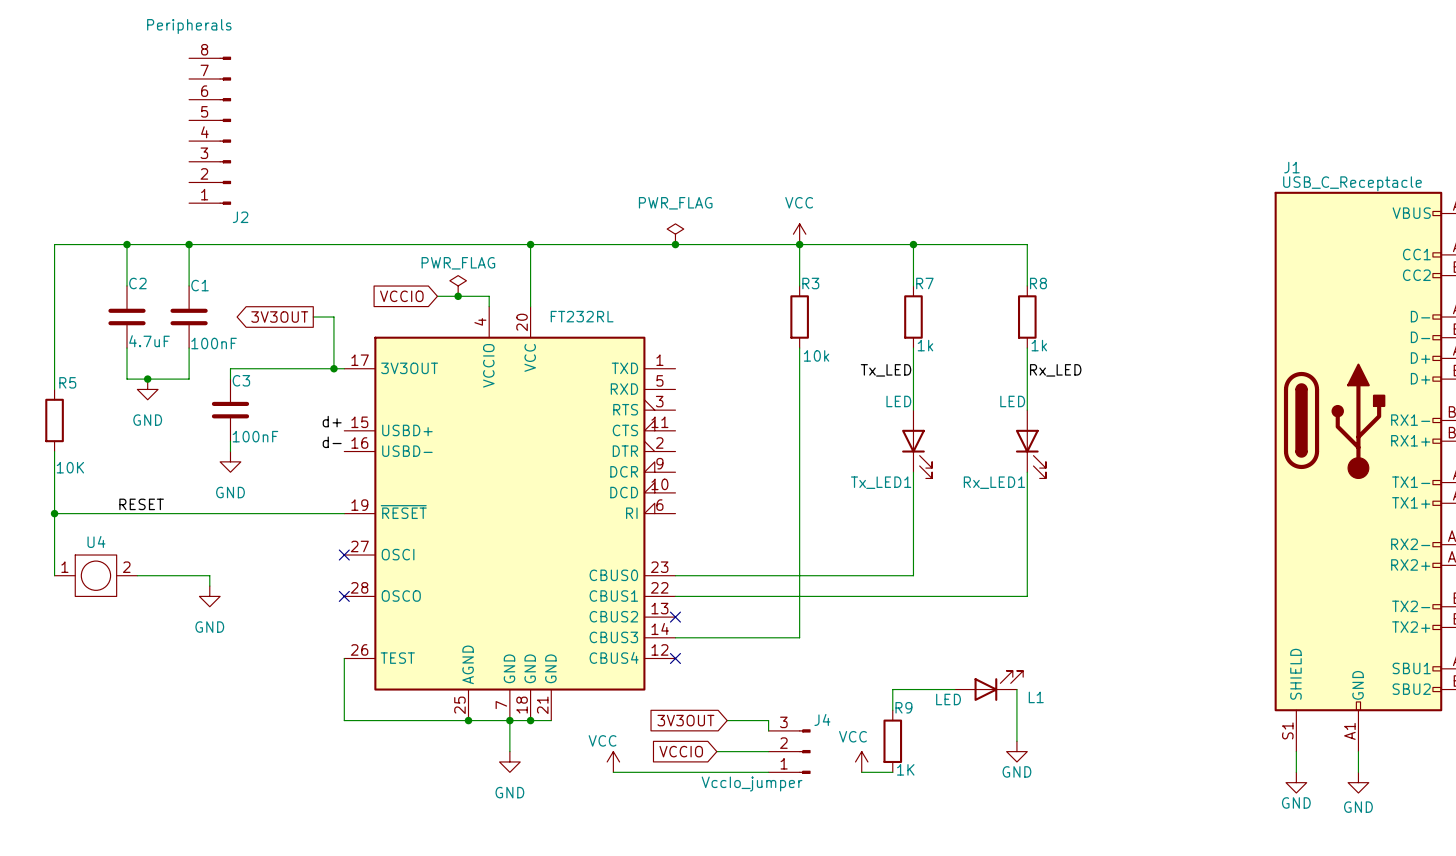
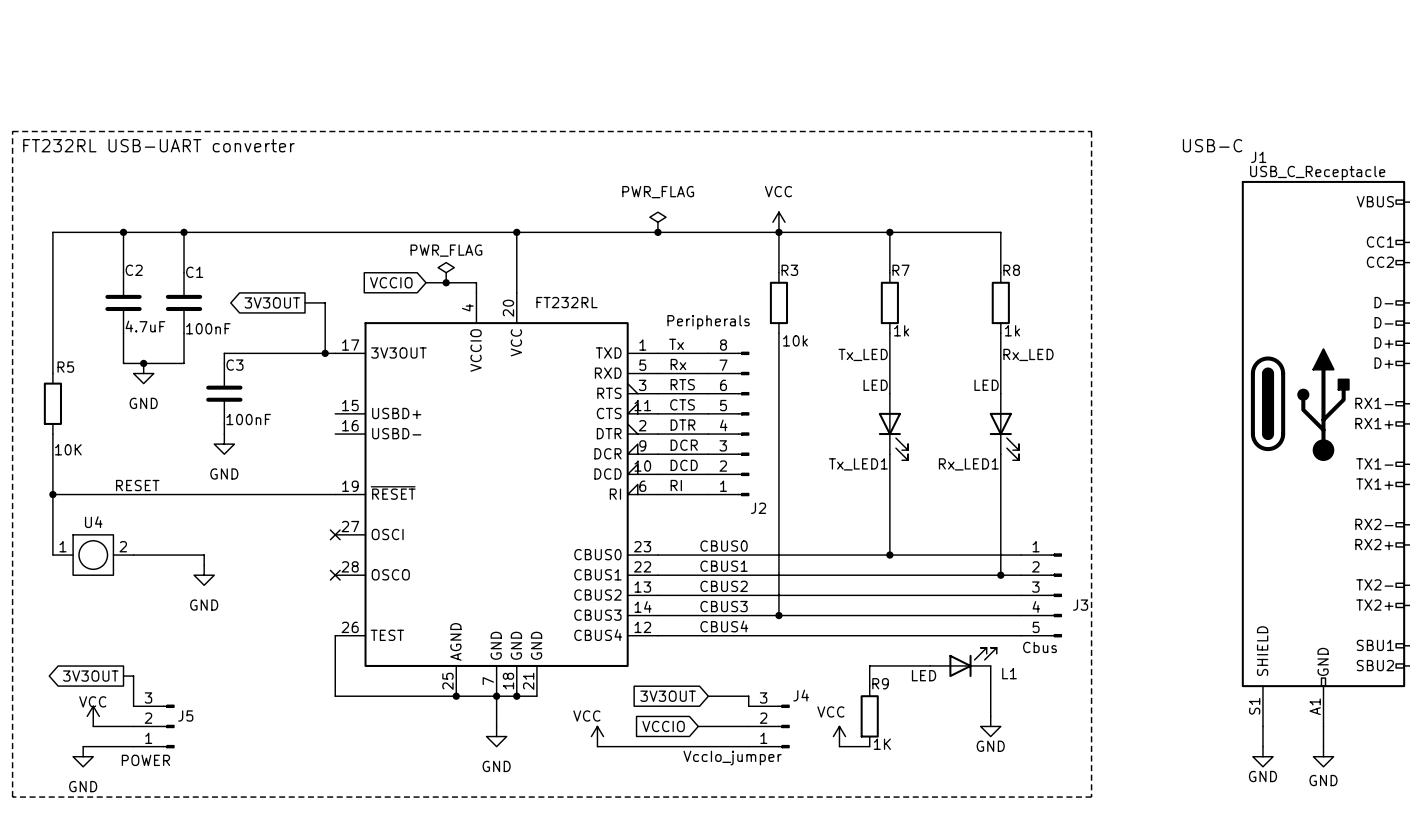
J2 position: (210, 130) -> (728, 423)
line: none -> (12, 131) (1091, 131) (1091, 797) (12, 797) (12, 131)
text: none -> FT232RL USB-UART converter (158, 145)
text: none -> USB-C (1212, 145)
label: none -> Tx (676, 344)
wire: none -> (657, 353) (708, 353)
label: none -> Rx (678, 364)
wire: none -> (657, 373) (708, 373)
label: none -> RTS (682, 384)
wire: none -> (657, 393) (708, 393)
label: d+ (332, 421) -> none
label: none -> CTS (682, 404)
wire: none -> (657, 413) (708, 413)
label: d- (332, 442) -> none
label: none -> DTR (683, 425)
wire: none -> (657, 434) (708, 434)
label: none -> DCR (684, 445)
wire: none -> (657, 454) (708, 454)
label: none -> DCD (684, 465)
wire: none -> (657, 474) (708, 474)
label: none -> RI (676, 485)
wire: none -> (657, 494) (708, 494)
label: none -> CBUS0 (724, 546)
wire: none -> (889, 555) (1020, 555)
junction: none -> (889, 555)
label: none -> CBUS1 (724, 566)
wire: none -> (1000, 575) (1020, 575)
junction: none -> (1000, 575)
label: none -> CBUS2 (724, 586)
wire: none -> (657, 595) (1020, 595)
no-connect mark: (675, 617) -> none
J3: none -> Cbus (1041, 595)
label: none -> CBUS3 (724, 606)
wire: none -> (778, 615) (1020, 615)
junction: none -> (778, 615)
label: none -> CBUS4 (724, 626)
wire: none -> (657, 635) (1020, 635)
no-connect mark: (675, 658) -> none
global label: none -> 3V3OUT (90, 676)
wire: none -> (123, 676) (133, 676) (133, 706)
power symbol: none -> VCC (93, 716)
wire: none -> (93, 726) (133, 726)
J5: none -> POWER (154, 726)
wire: none -> (83, 746) (133, 746)
power symbol: none -> GND (83, 756)

